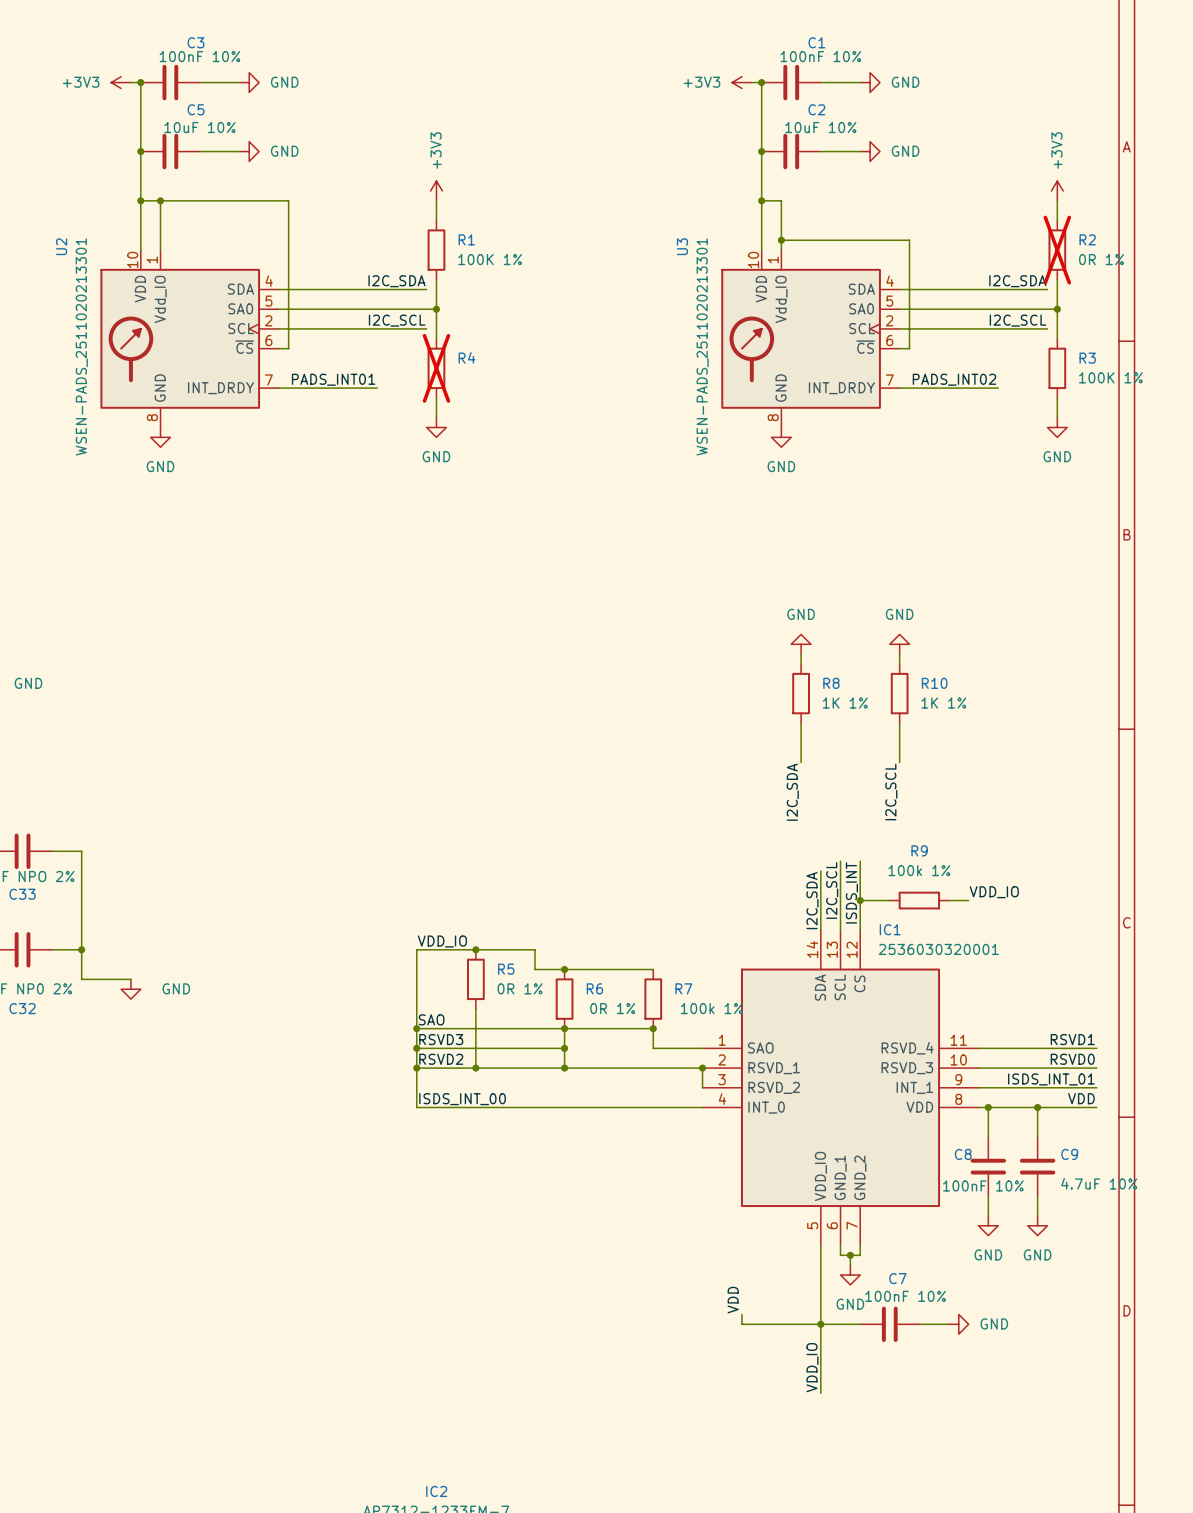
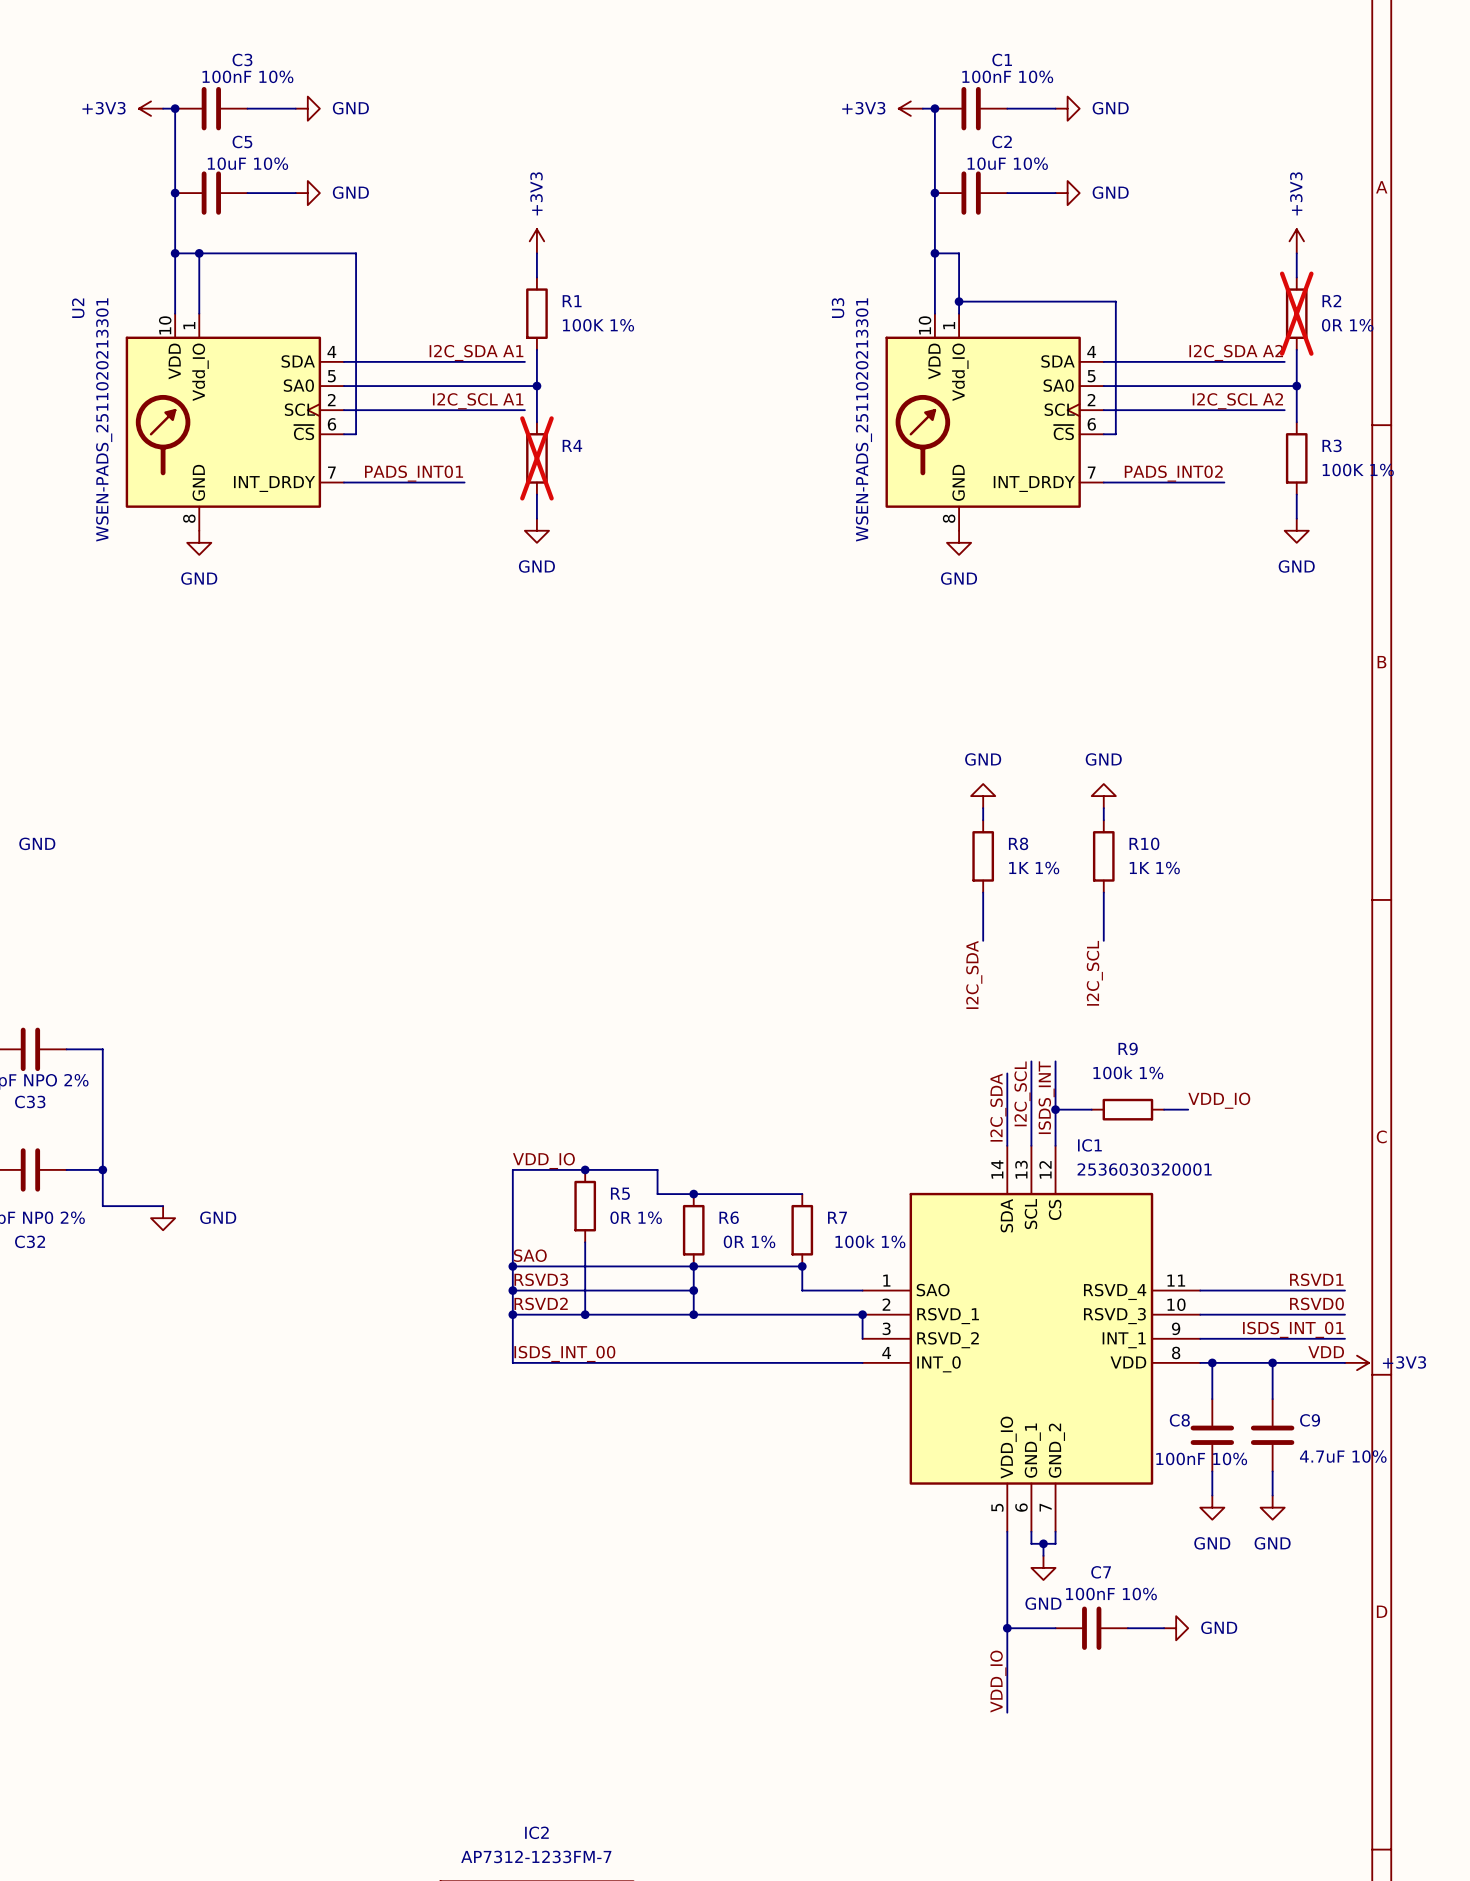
label: I2C_SDA (396, 281) -> I2C_SDA A1 (476, 353)
label: I2C_SDA (1017, 281) -> I2C_SDA A2 (1236, 353)
label: I2C_SCL (397, 320) -> I2C_SCL A1 (478, 401)
label: I2C_SCL (1018, 320) -> I2C_SCL A2 (1237, 401)
power symbol: none -> +3V3 (1357, 1362)
label: VDD (733, 1300) -> none
wire: (741, 1314) (741, 1324) (820, 1324) -> none

